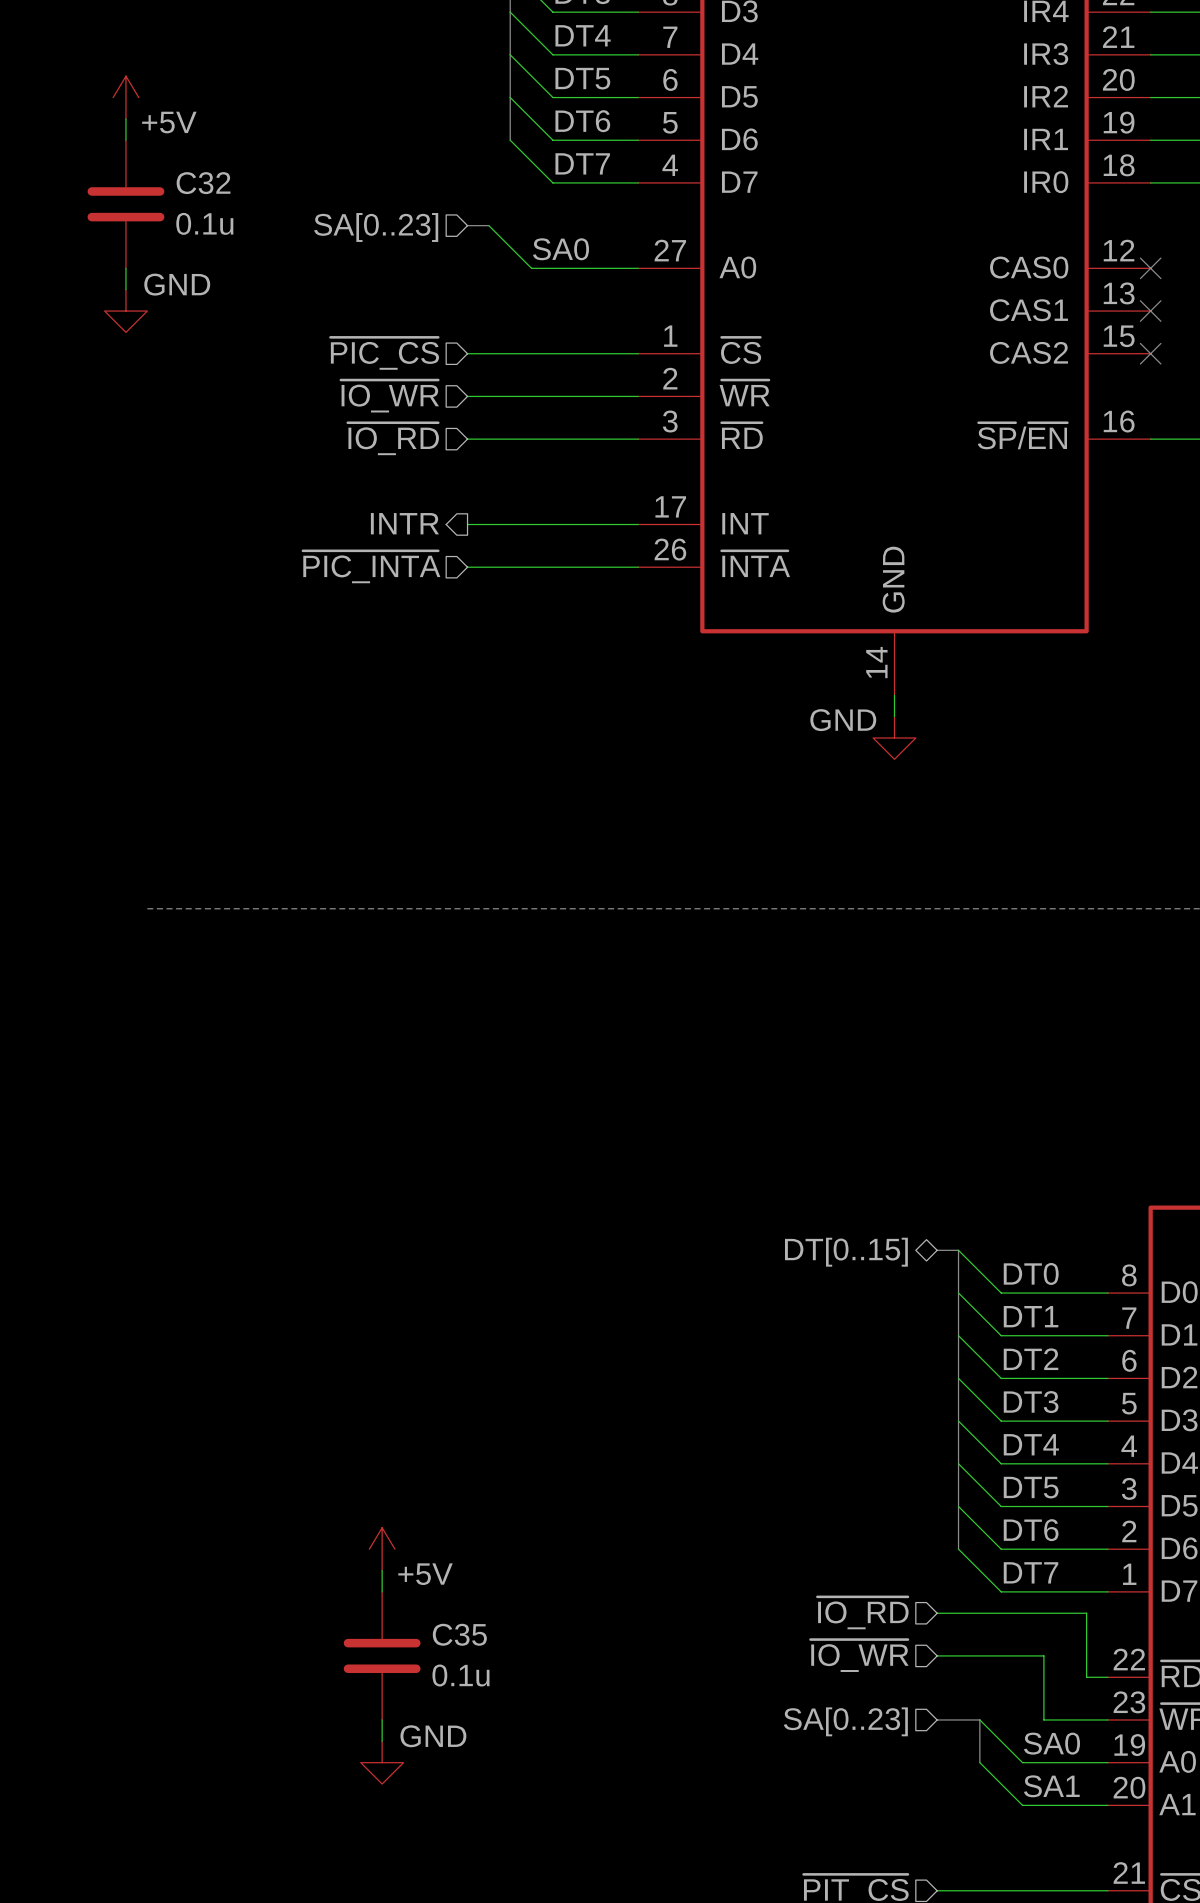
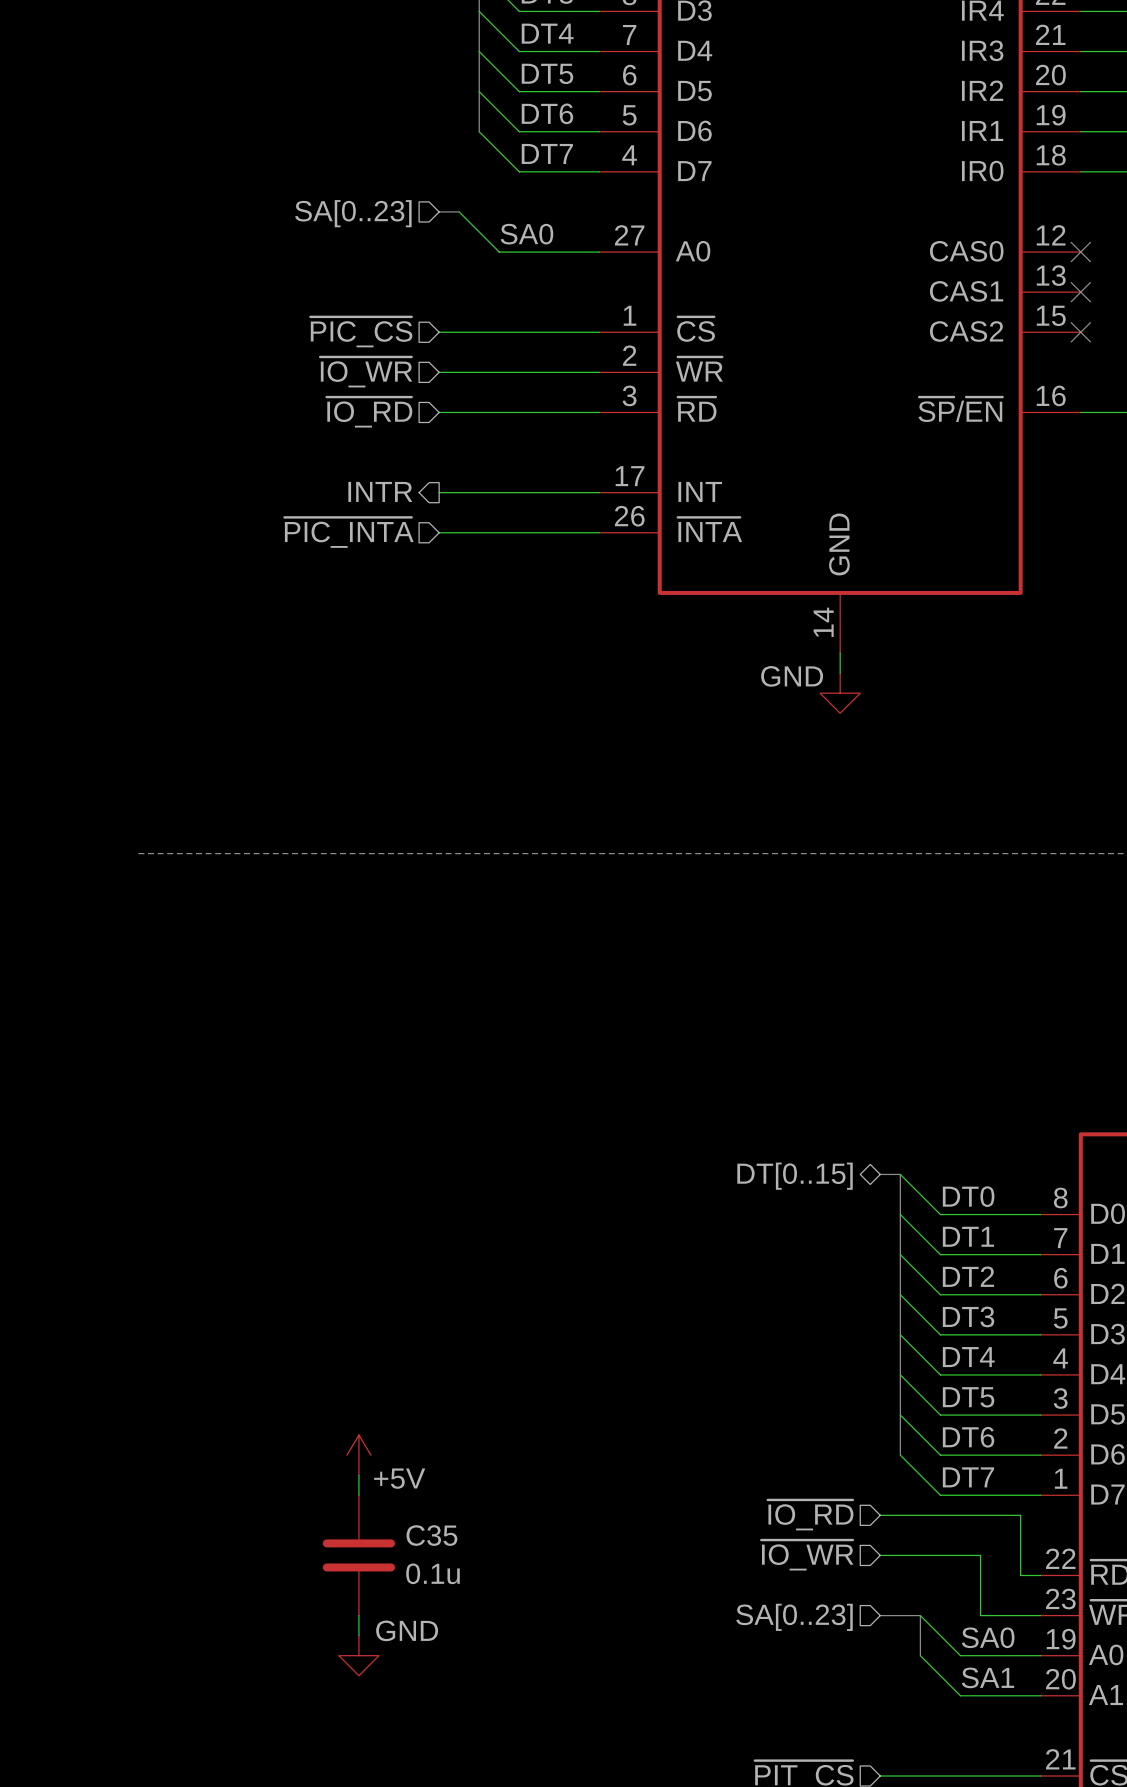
power symbol: +5V (125, 97) -> none
wire: (125, 118) (125, 140) -> none
C32: 0.1u (125, 204) -> none
wire: (125, 268) (125, 289) -> none
power symbol: GND (125, 311) -> none

